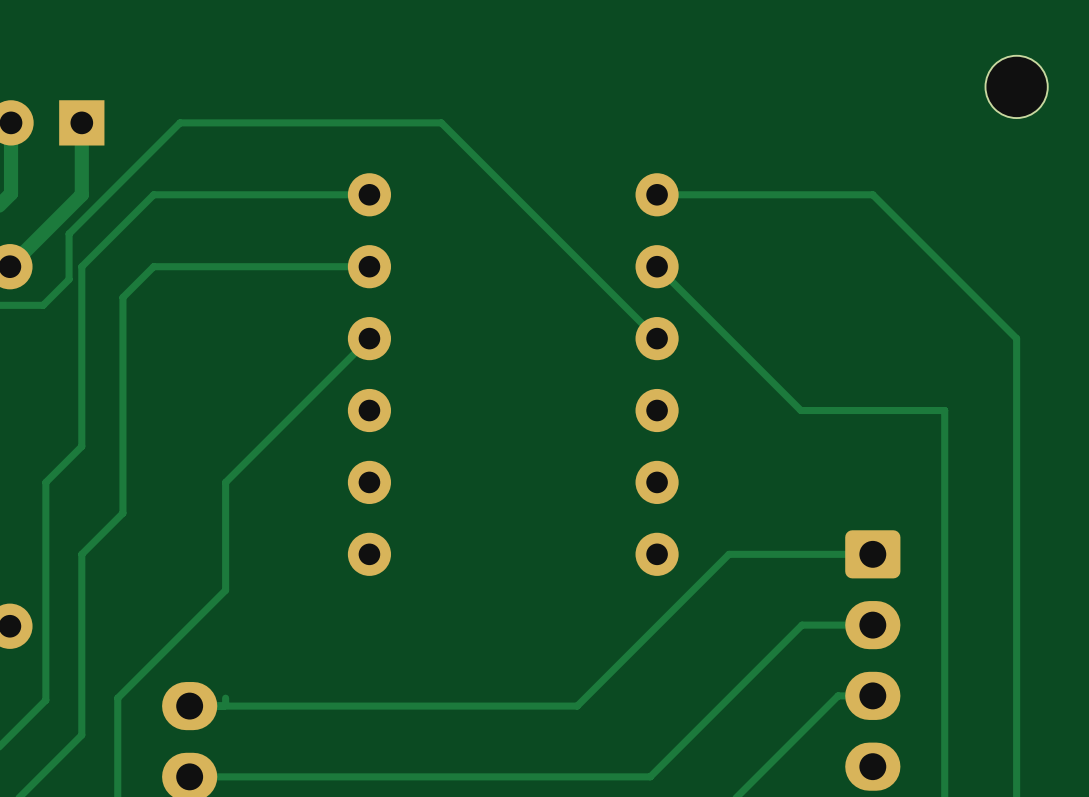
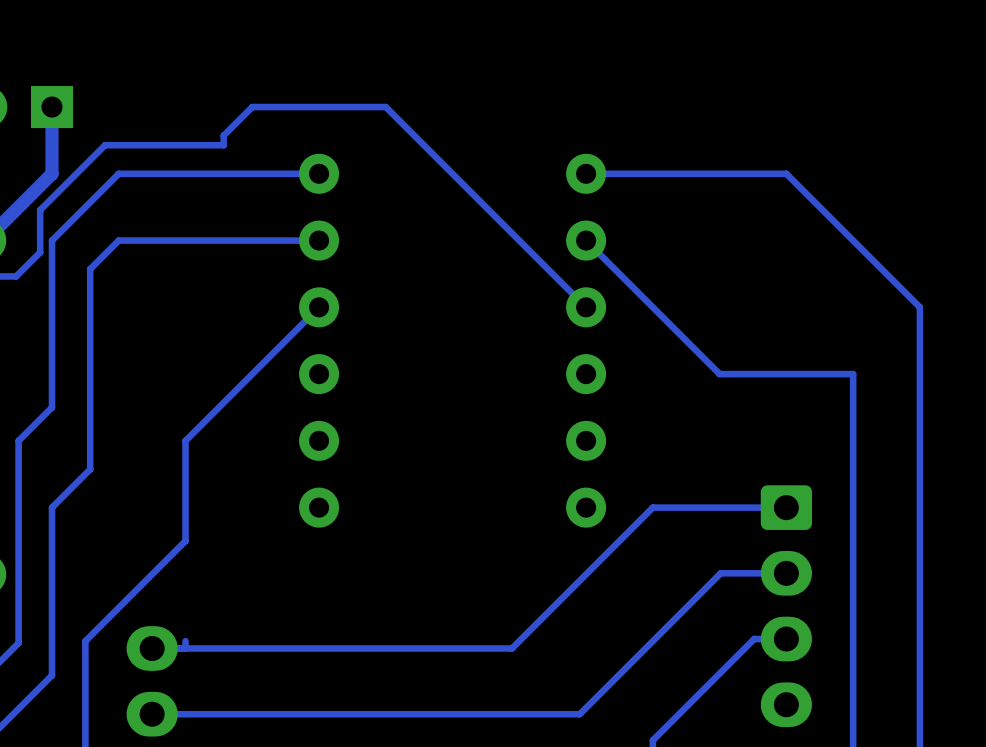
part: (1016, 86) -> none
track: (297, 122) (180, 122) (138, 164) -> (252, 107) (223, 135) (223, 145) (105, 145)

